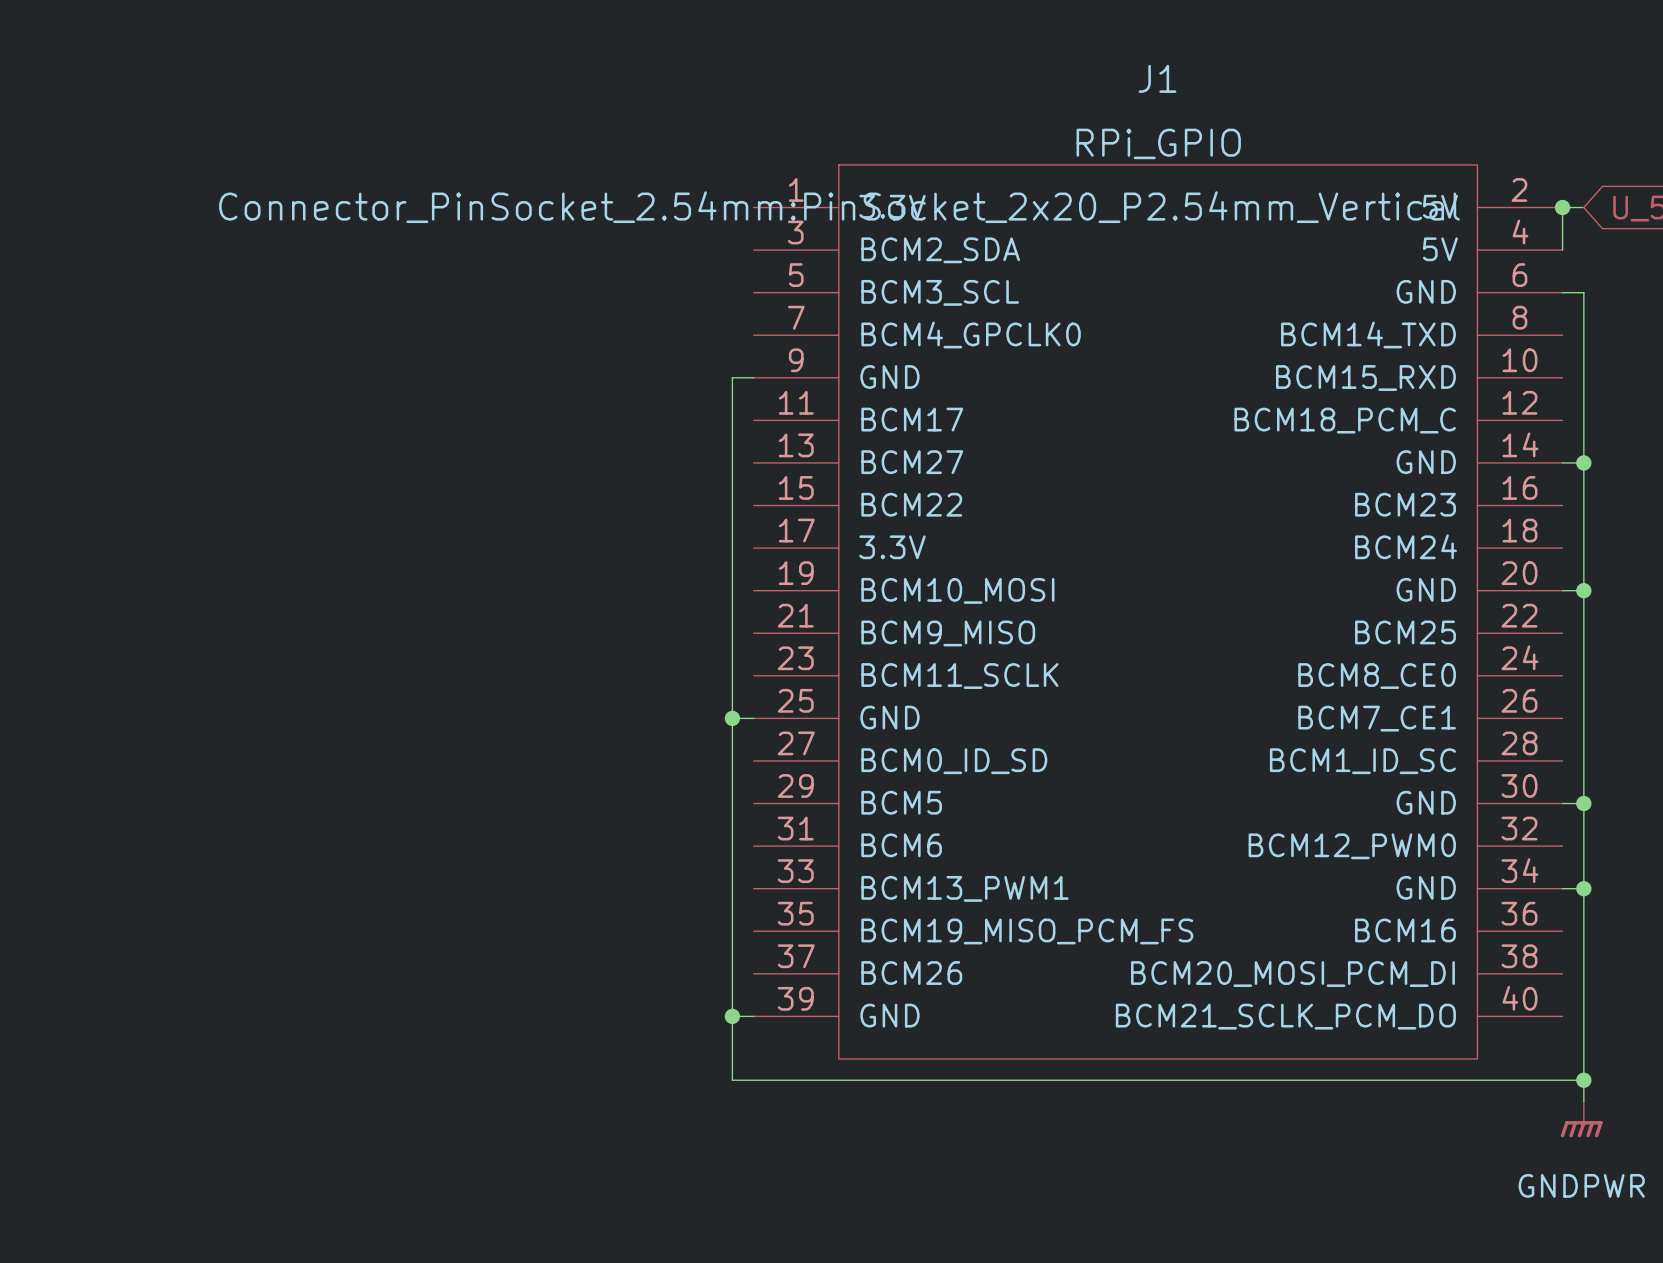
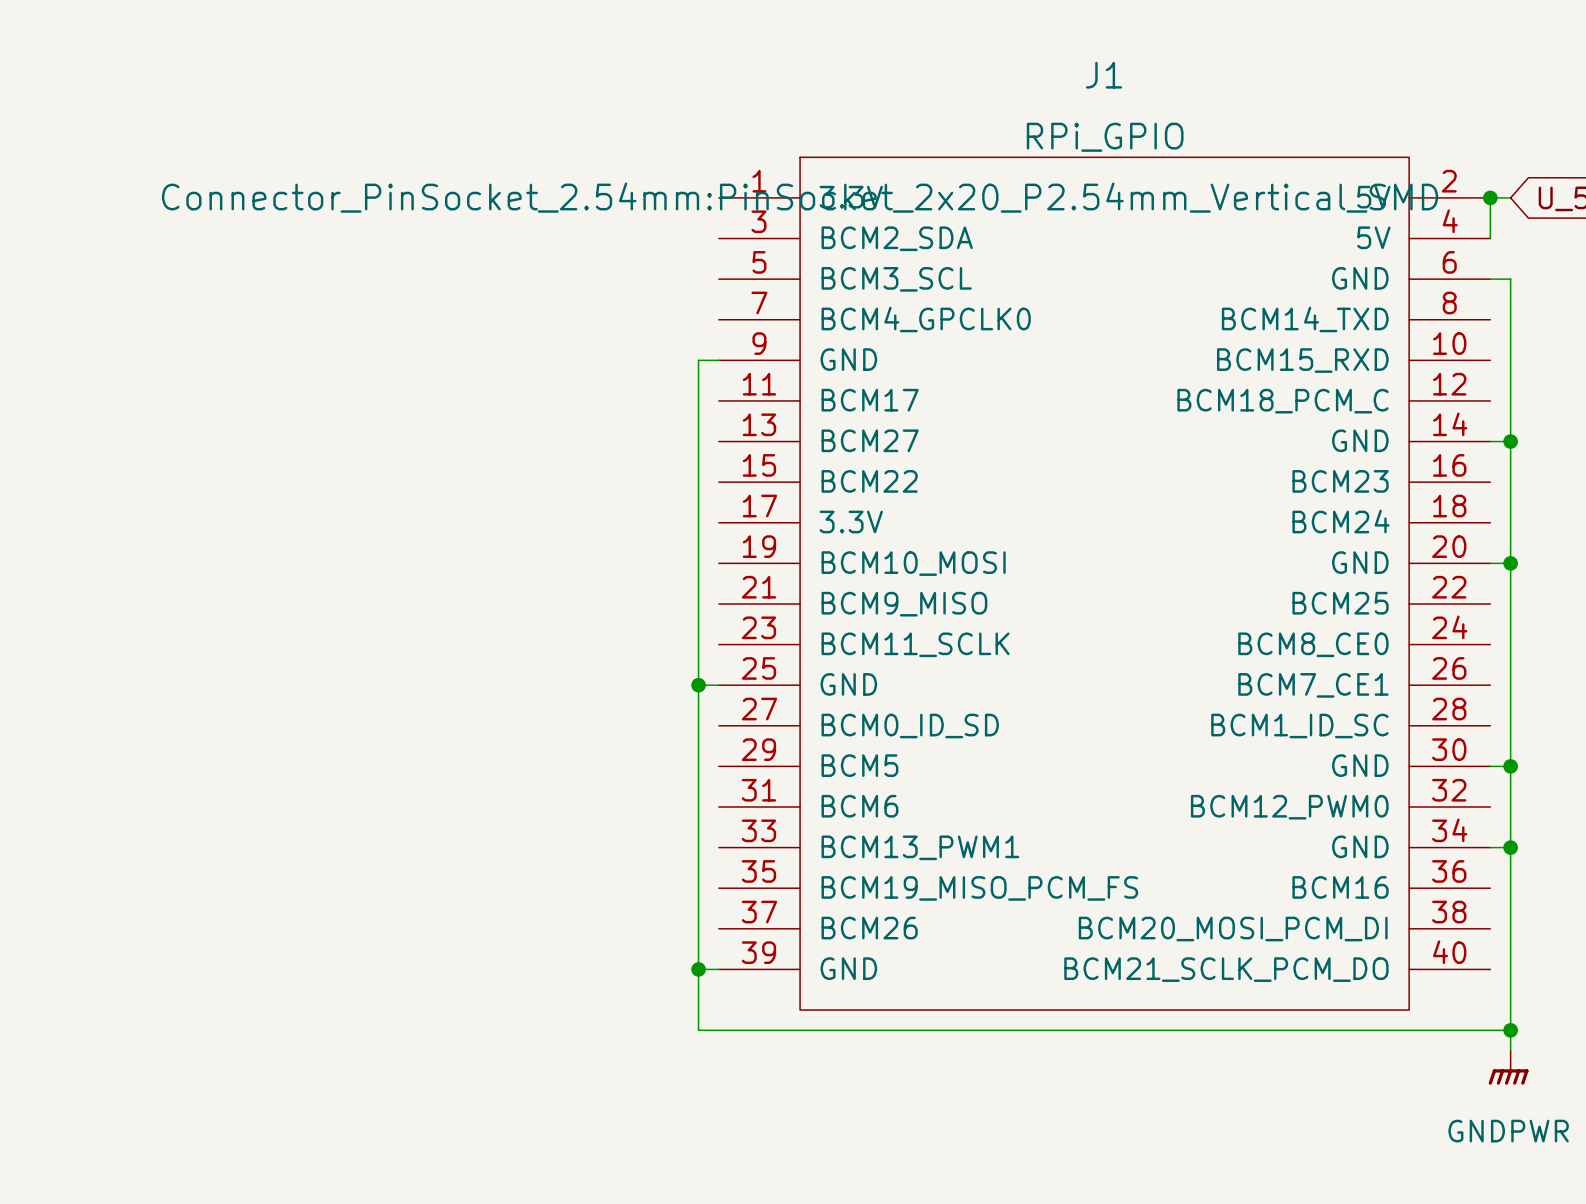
J1 text: Connector_PinSocket_2.54mm:PinSocket_2x20_P2.54mm_Vertical (839, 207) -> Connector_PinSocket_2.54mm:PinSocket_2x20_P2.54mm_Vertical_SMD (800, 197)

